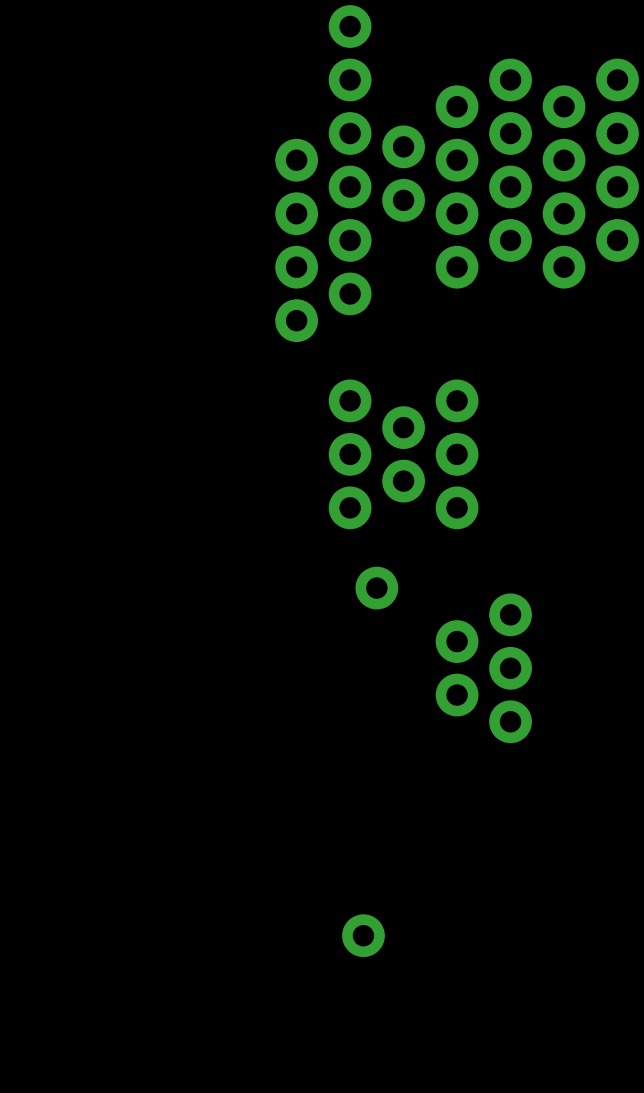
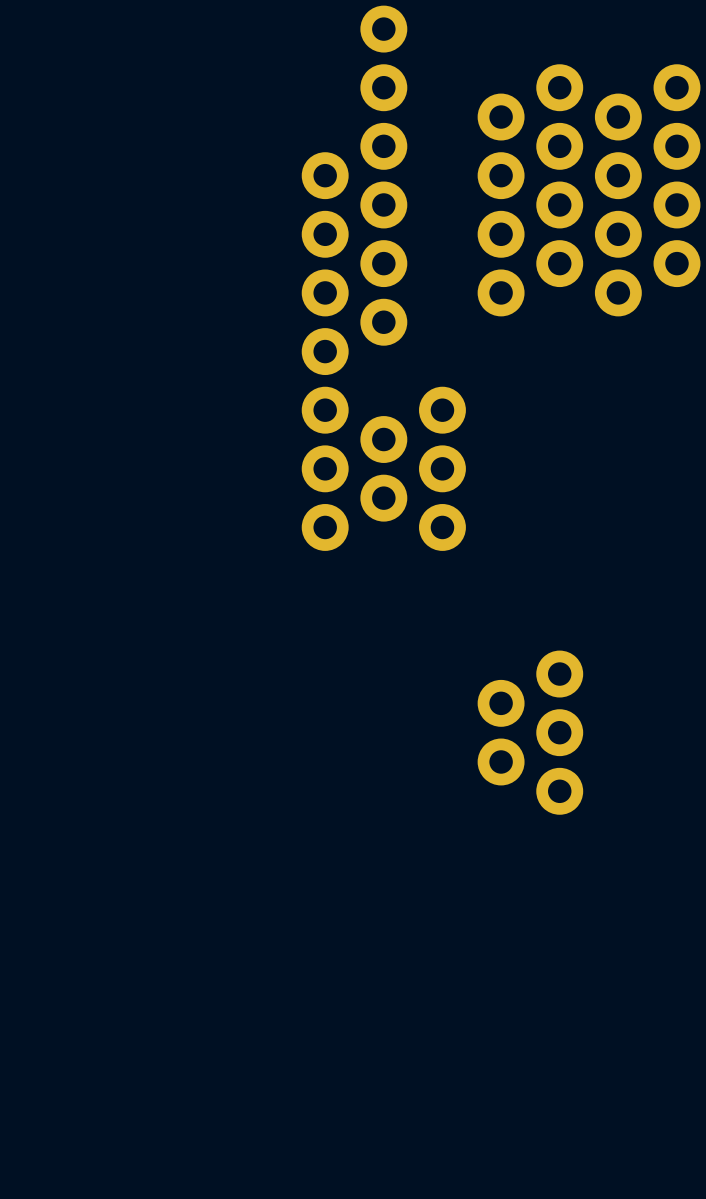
part: (403, 146) -> none
part: (403, 200) -> none
part: none -> (325, 410)
part: none -> (442, 410)
part: (457, 400) -> none
part: none -> (325, 468)
part: (457, 454) -> none
part: none -> (325, 527)
part: (350, 507) -> none
part: (457, 507) -> none
part: (376, 588) -> none
part: (363, 935) -> none

